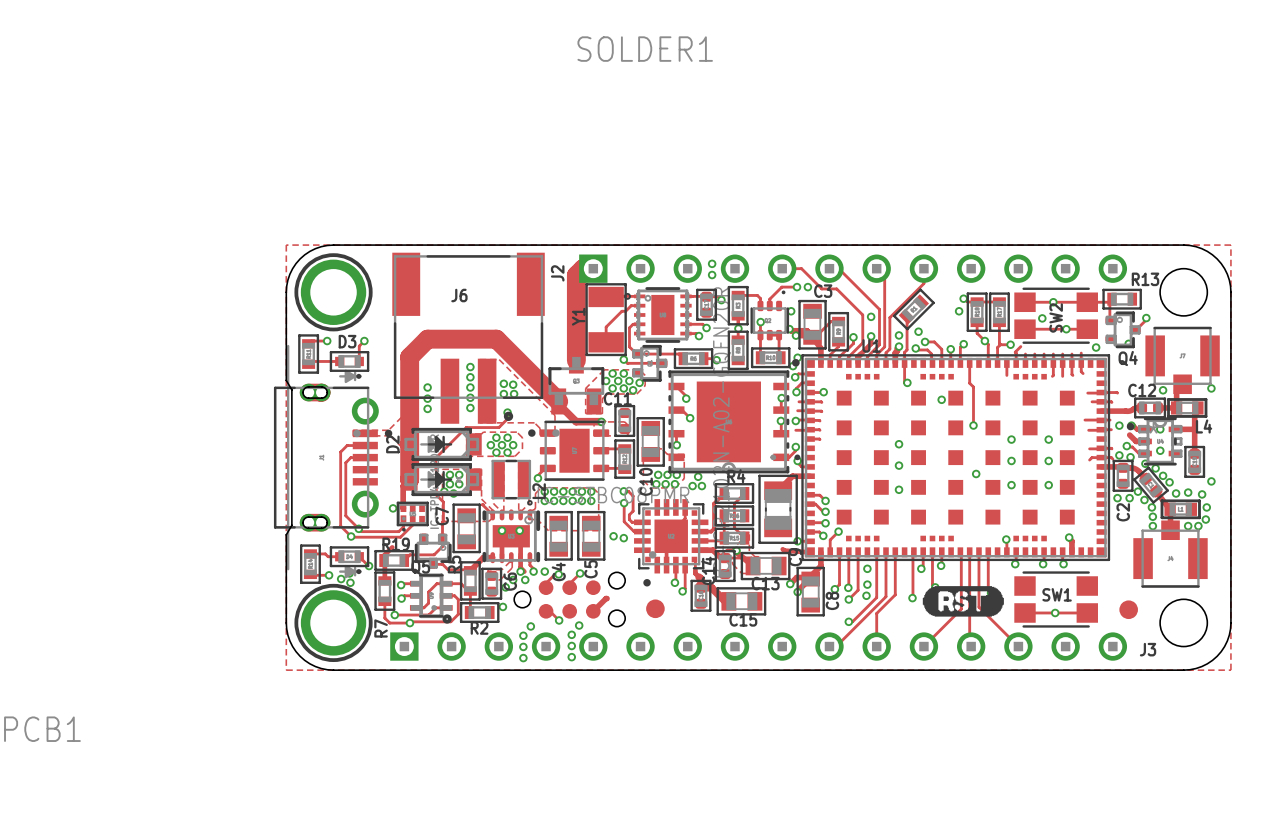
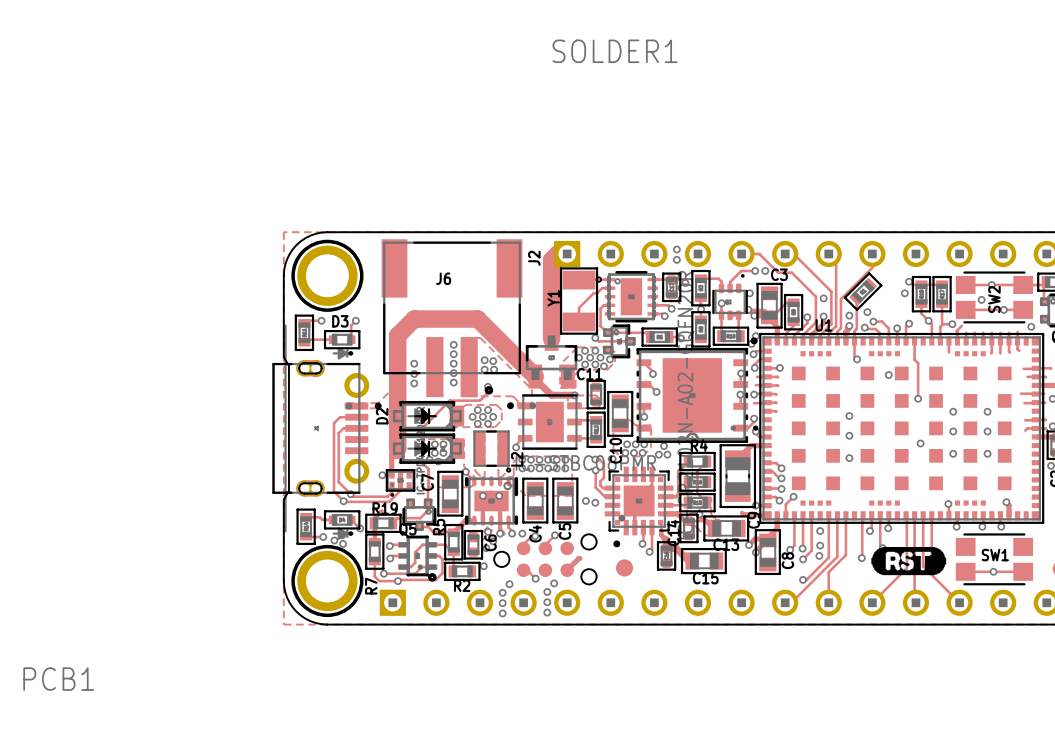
via: none -> (465, 471)
via position: (525, 579) -> (488, 531)

